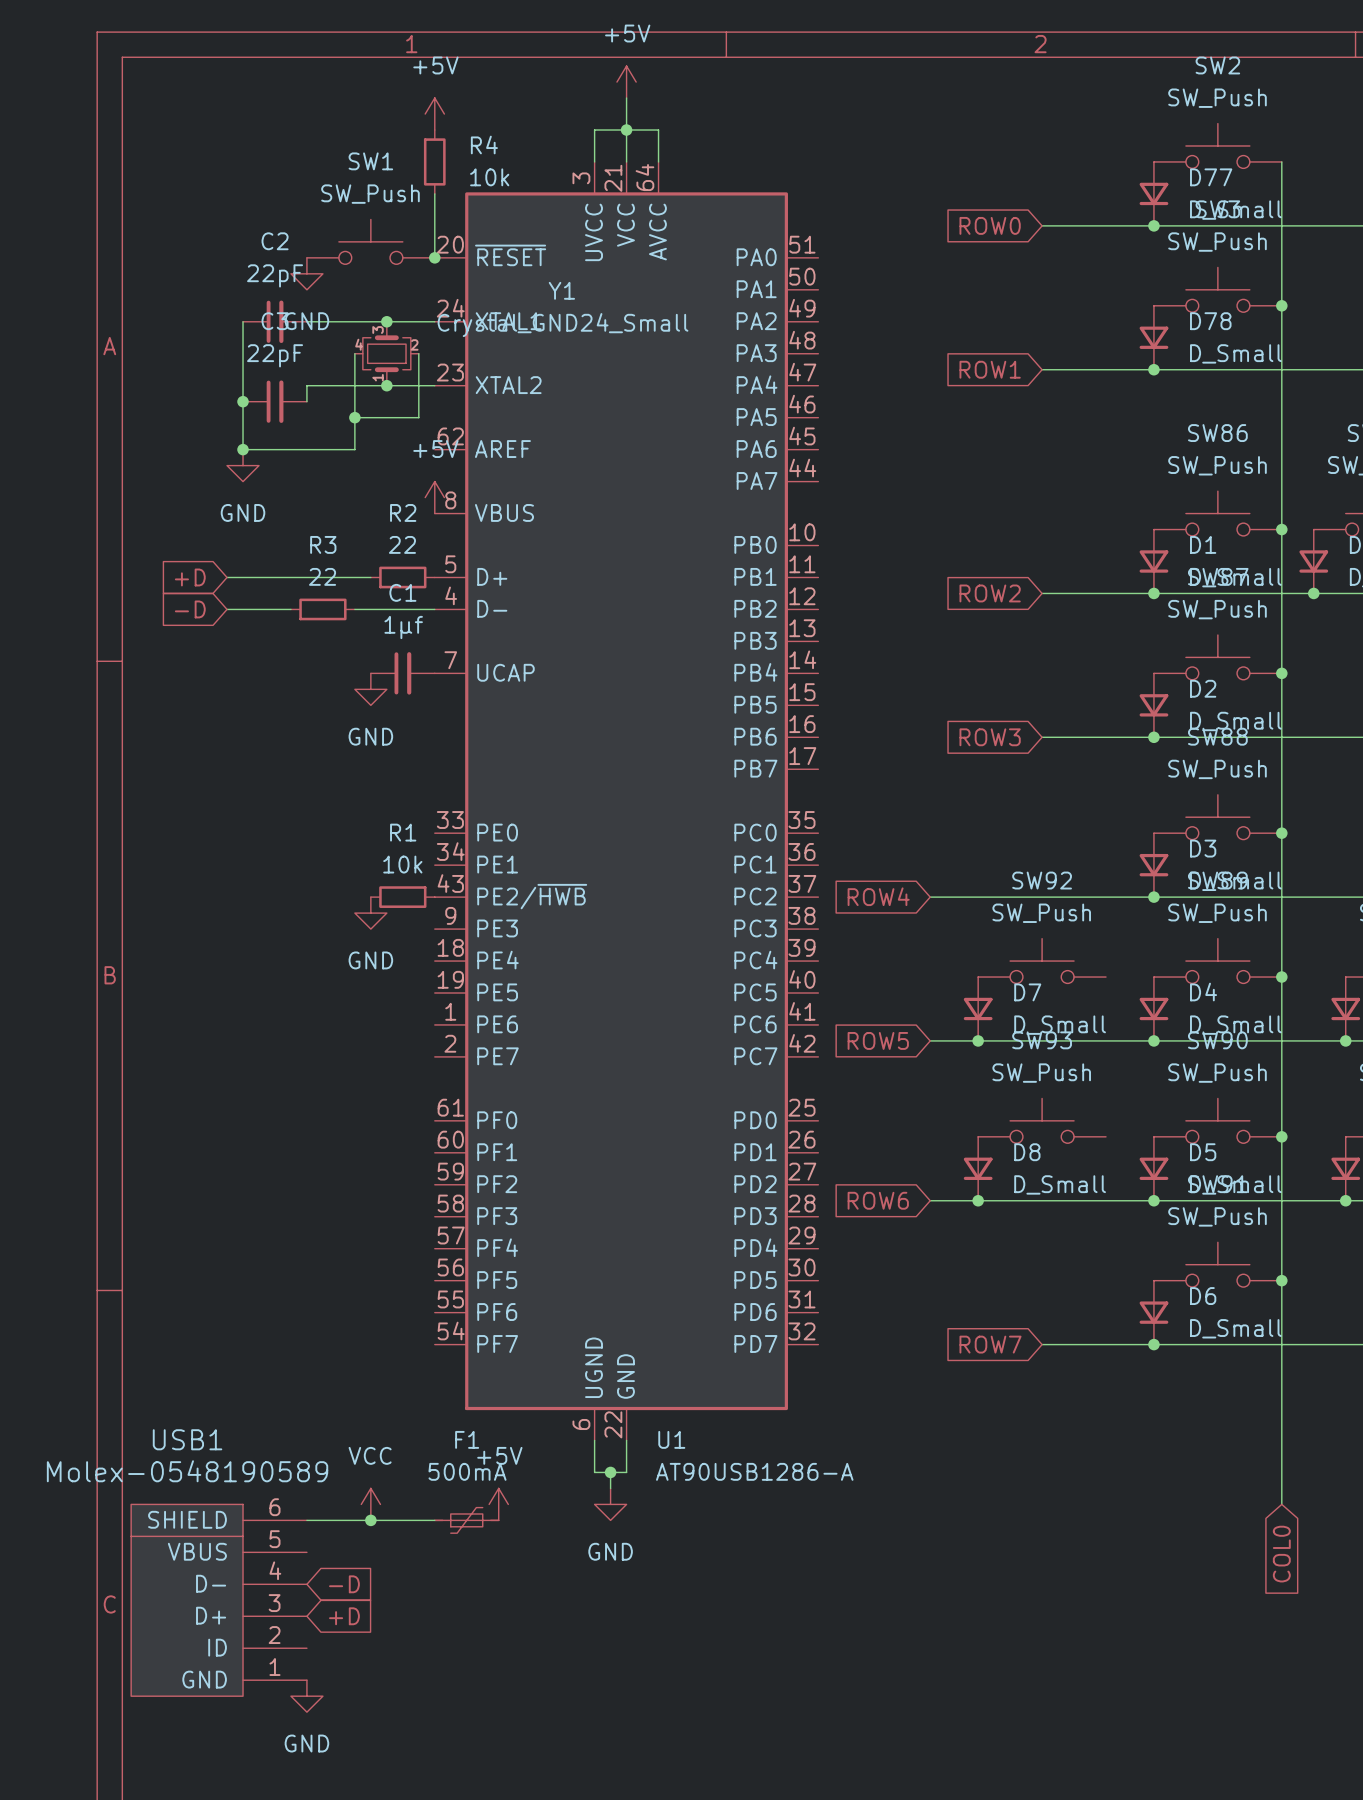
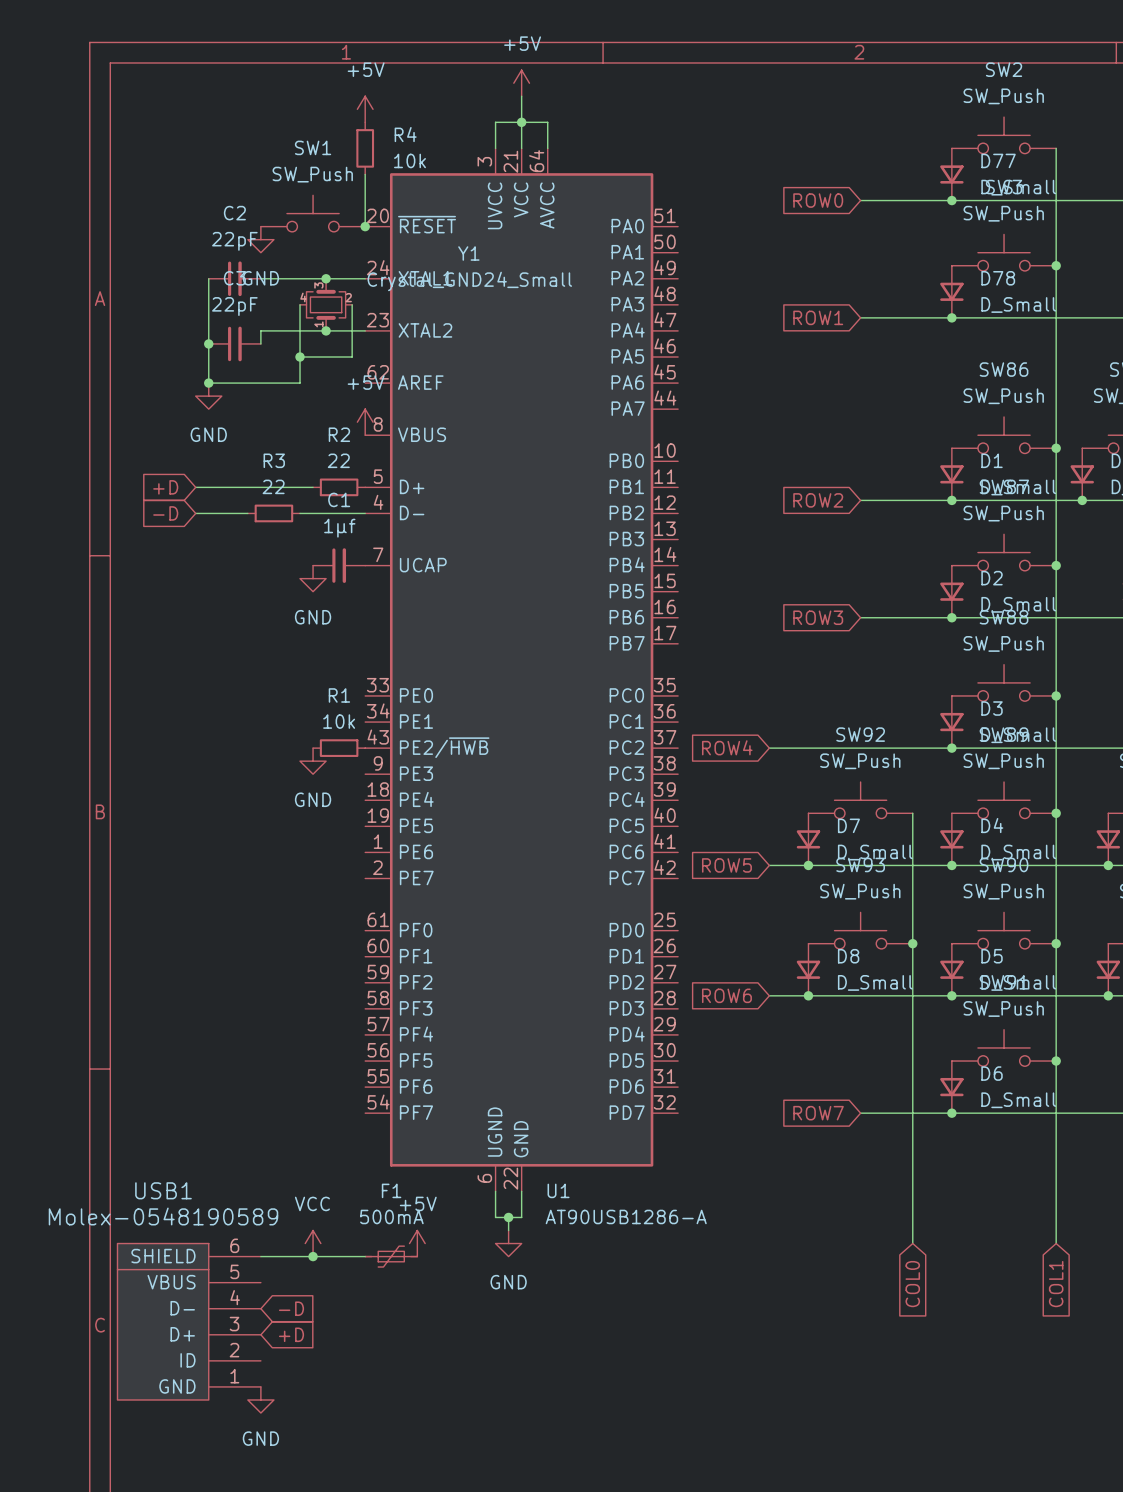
wire: none -> (912, 813) (912, 1243)
junction: none -> (912, 943)
global label: none -> COL0 (912, 1284)
global label: COL0 (1281, 1554) -> COL1 (1056, 1284)

